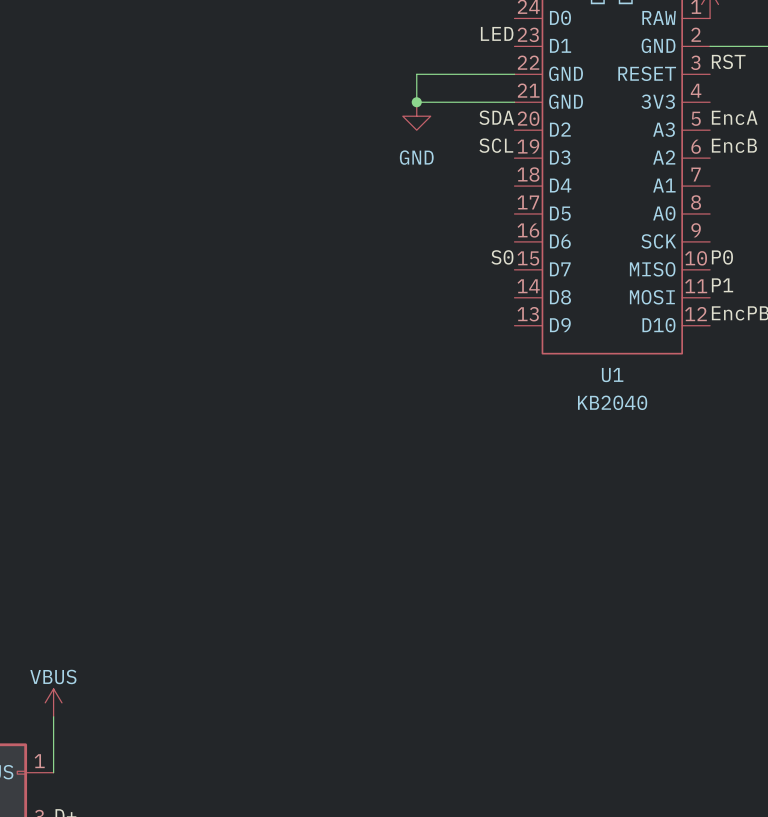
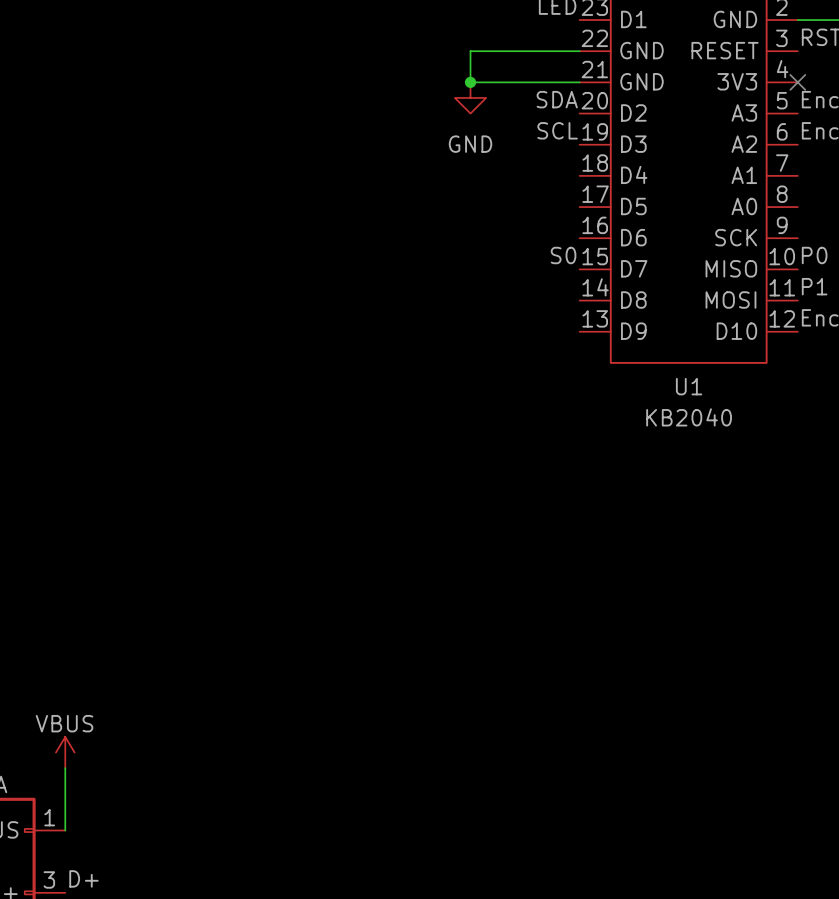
no-connect mark: none -> (797, 82)

